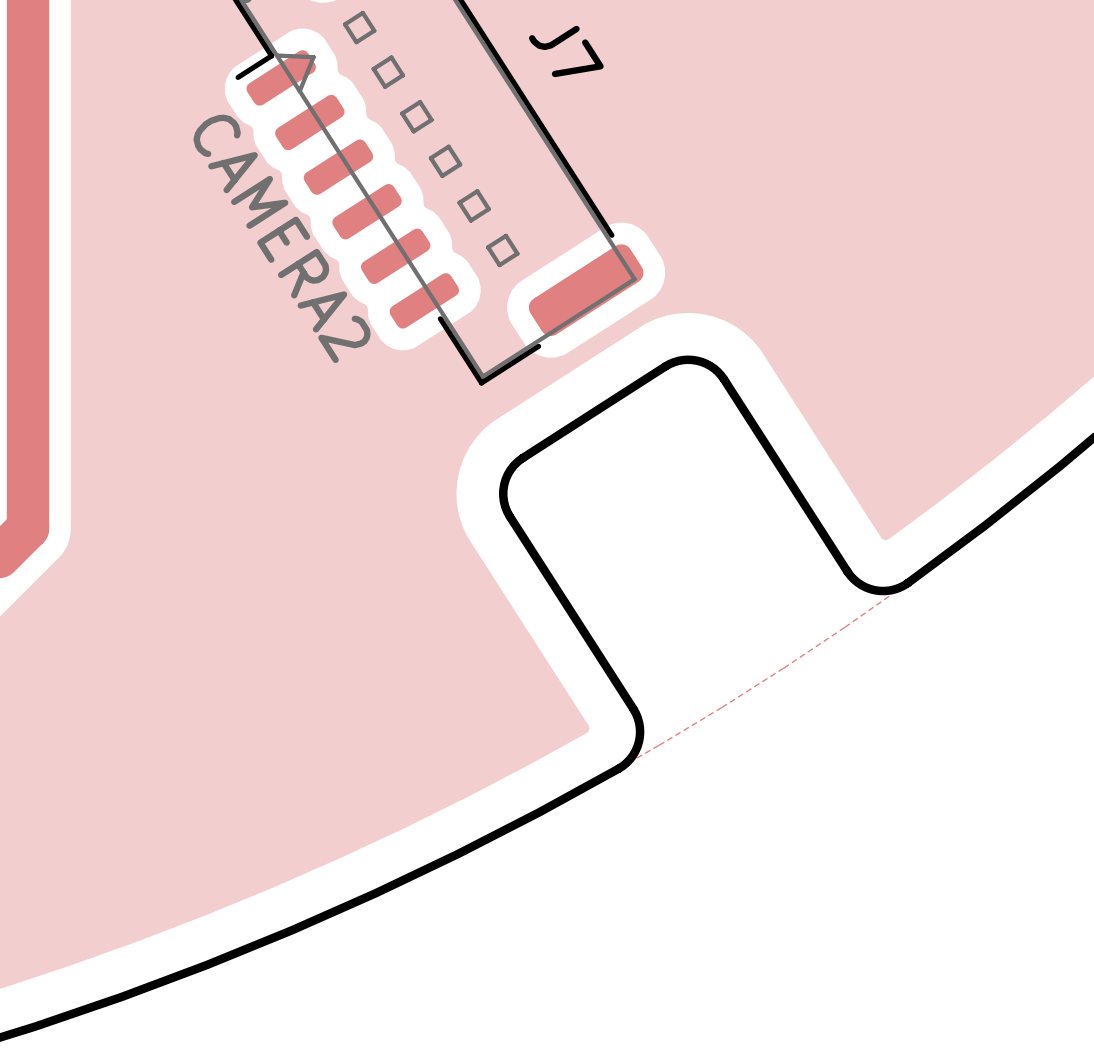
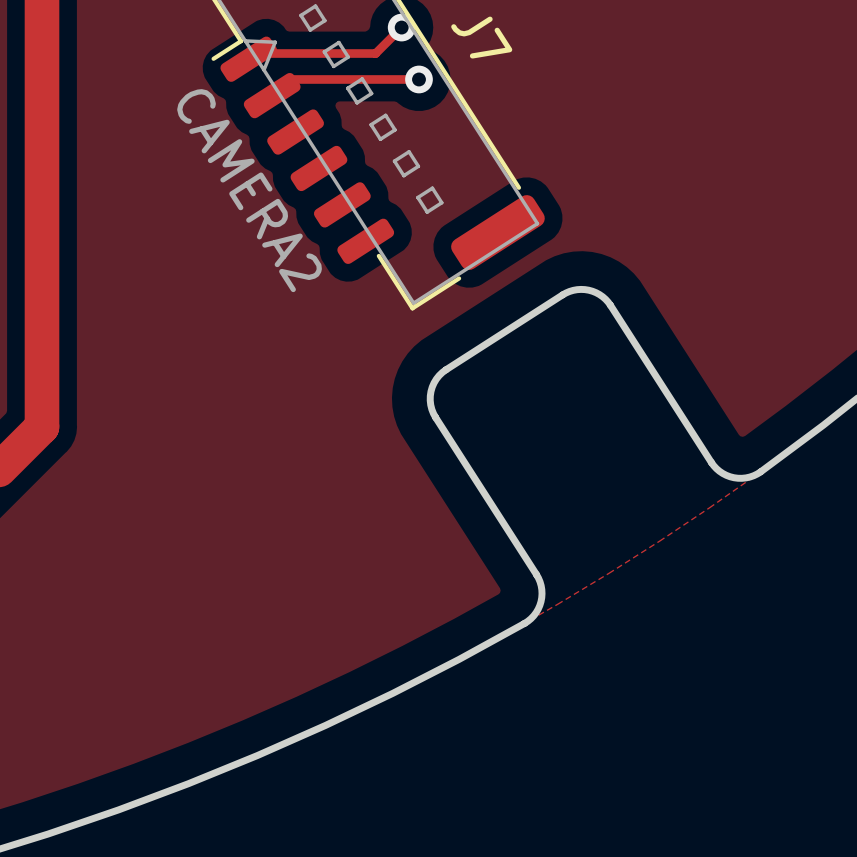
track: none -> (401, 27) (375, 53) (254, 53) (248, 59)
via: none -> (401, 27)
track: none -> (418, 79) (288, 79) (272, 95)
via: none -> (418, 79)

